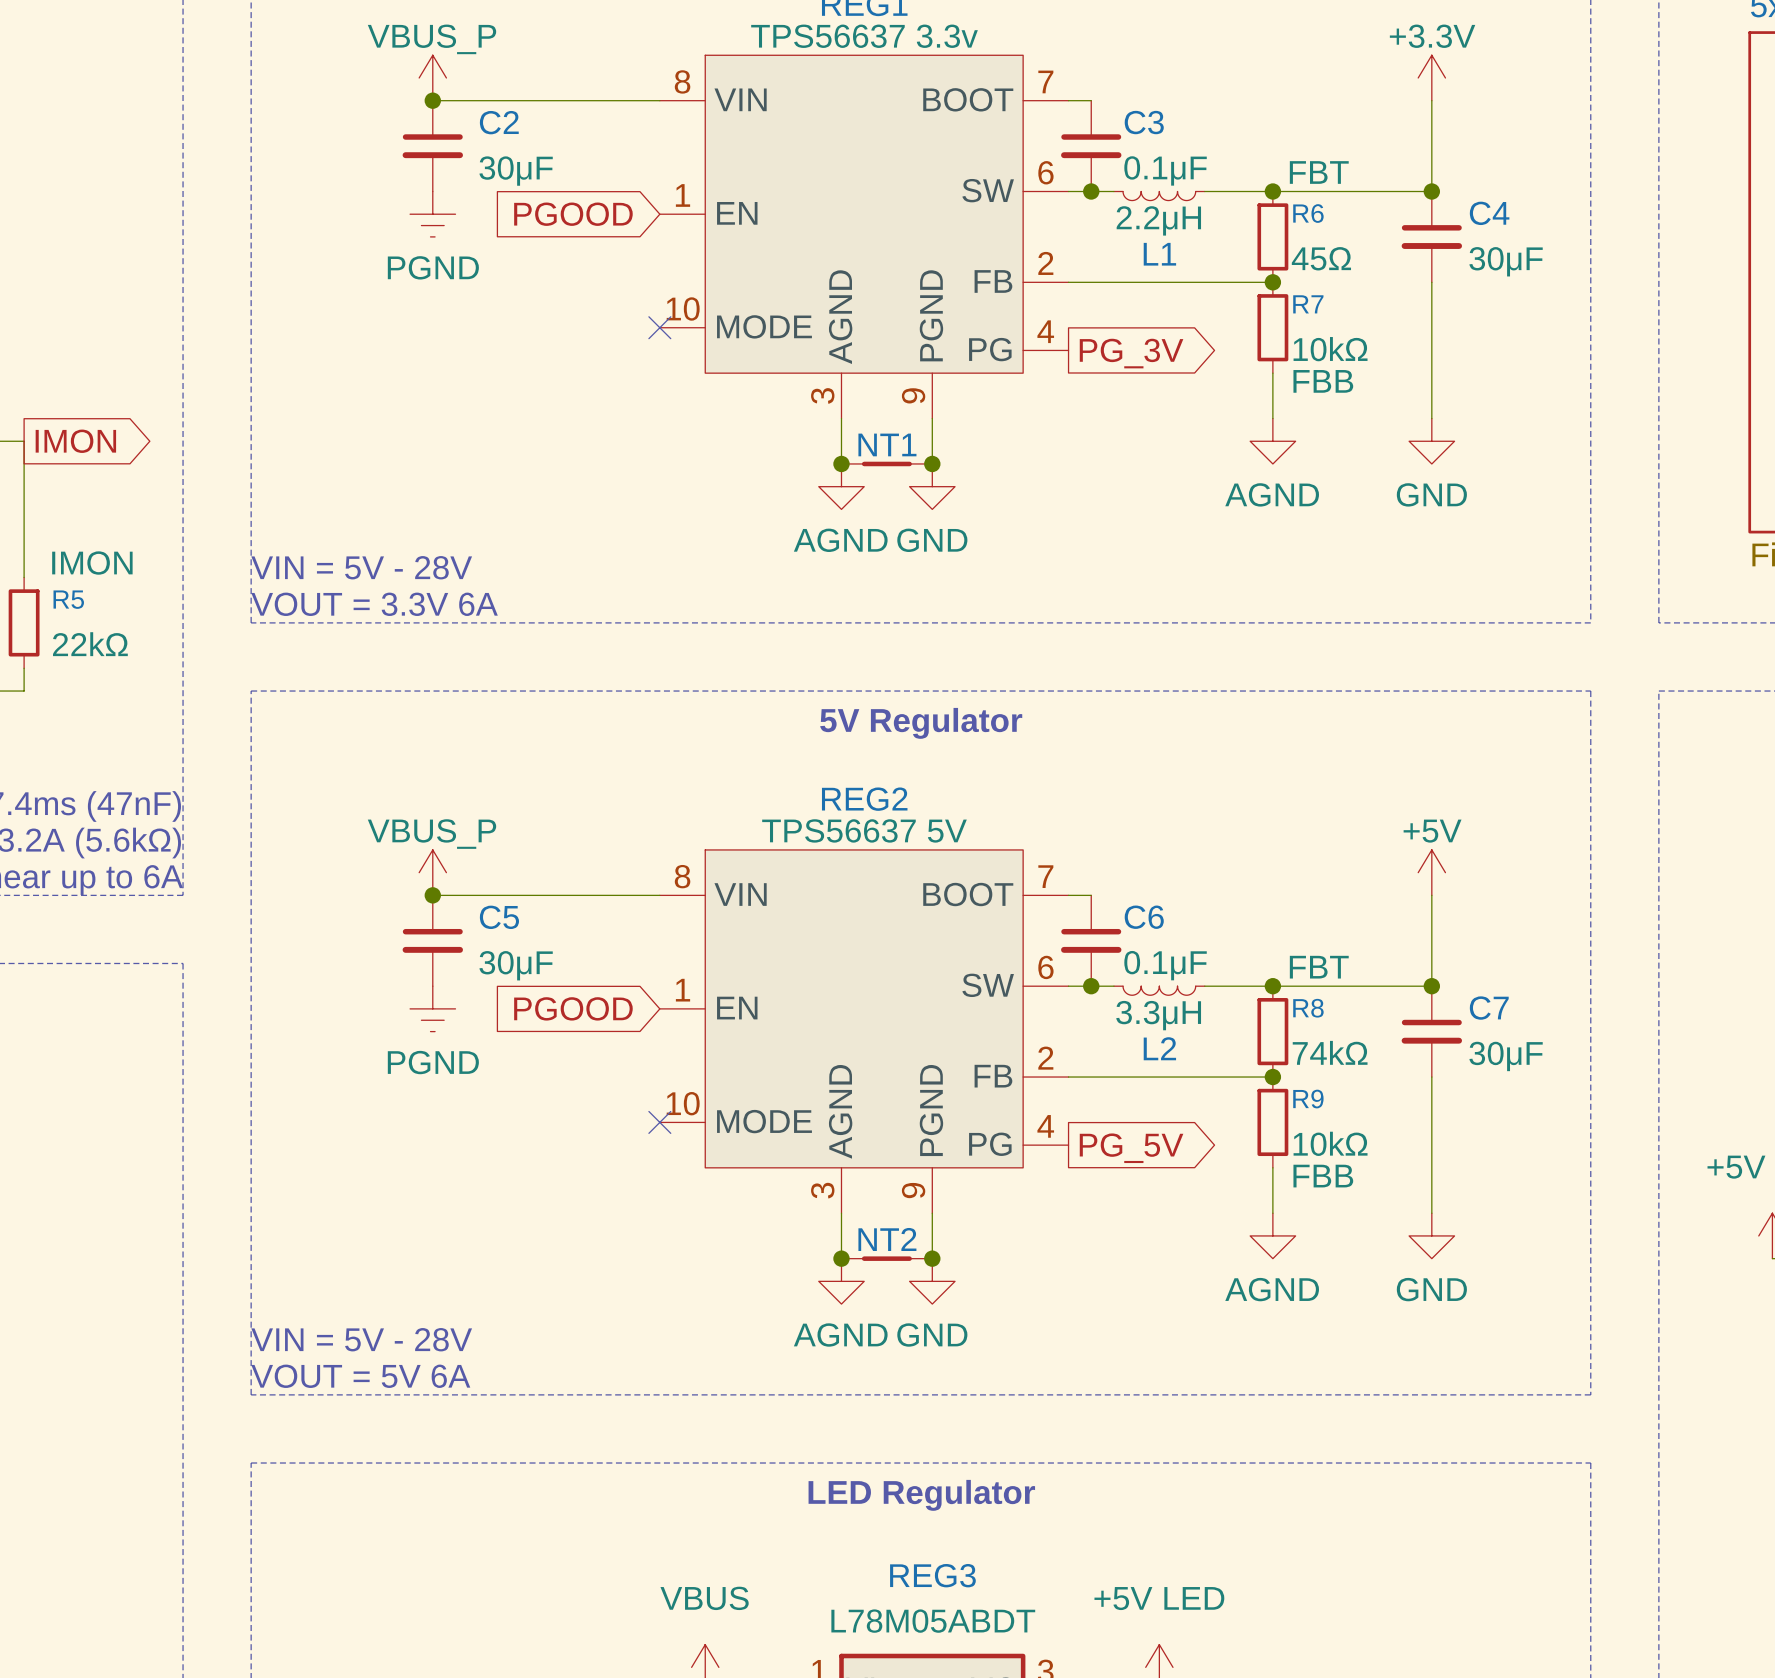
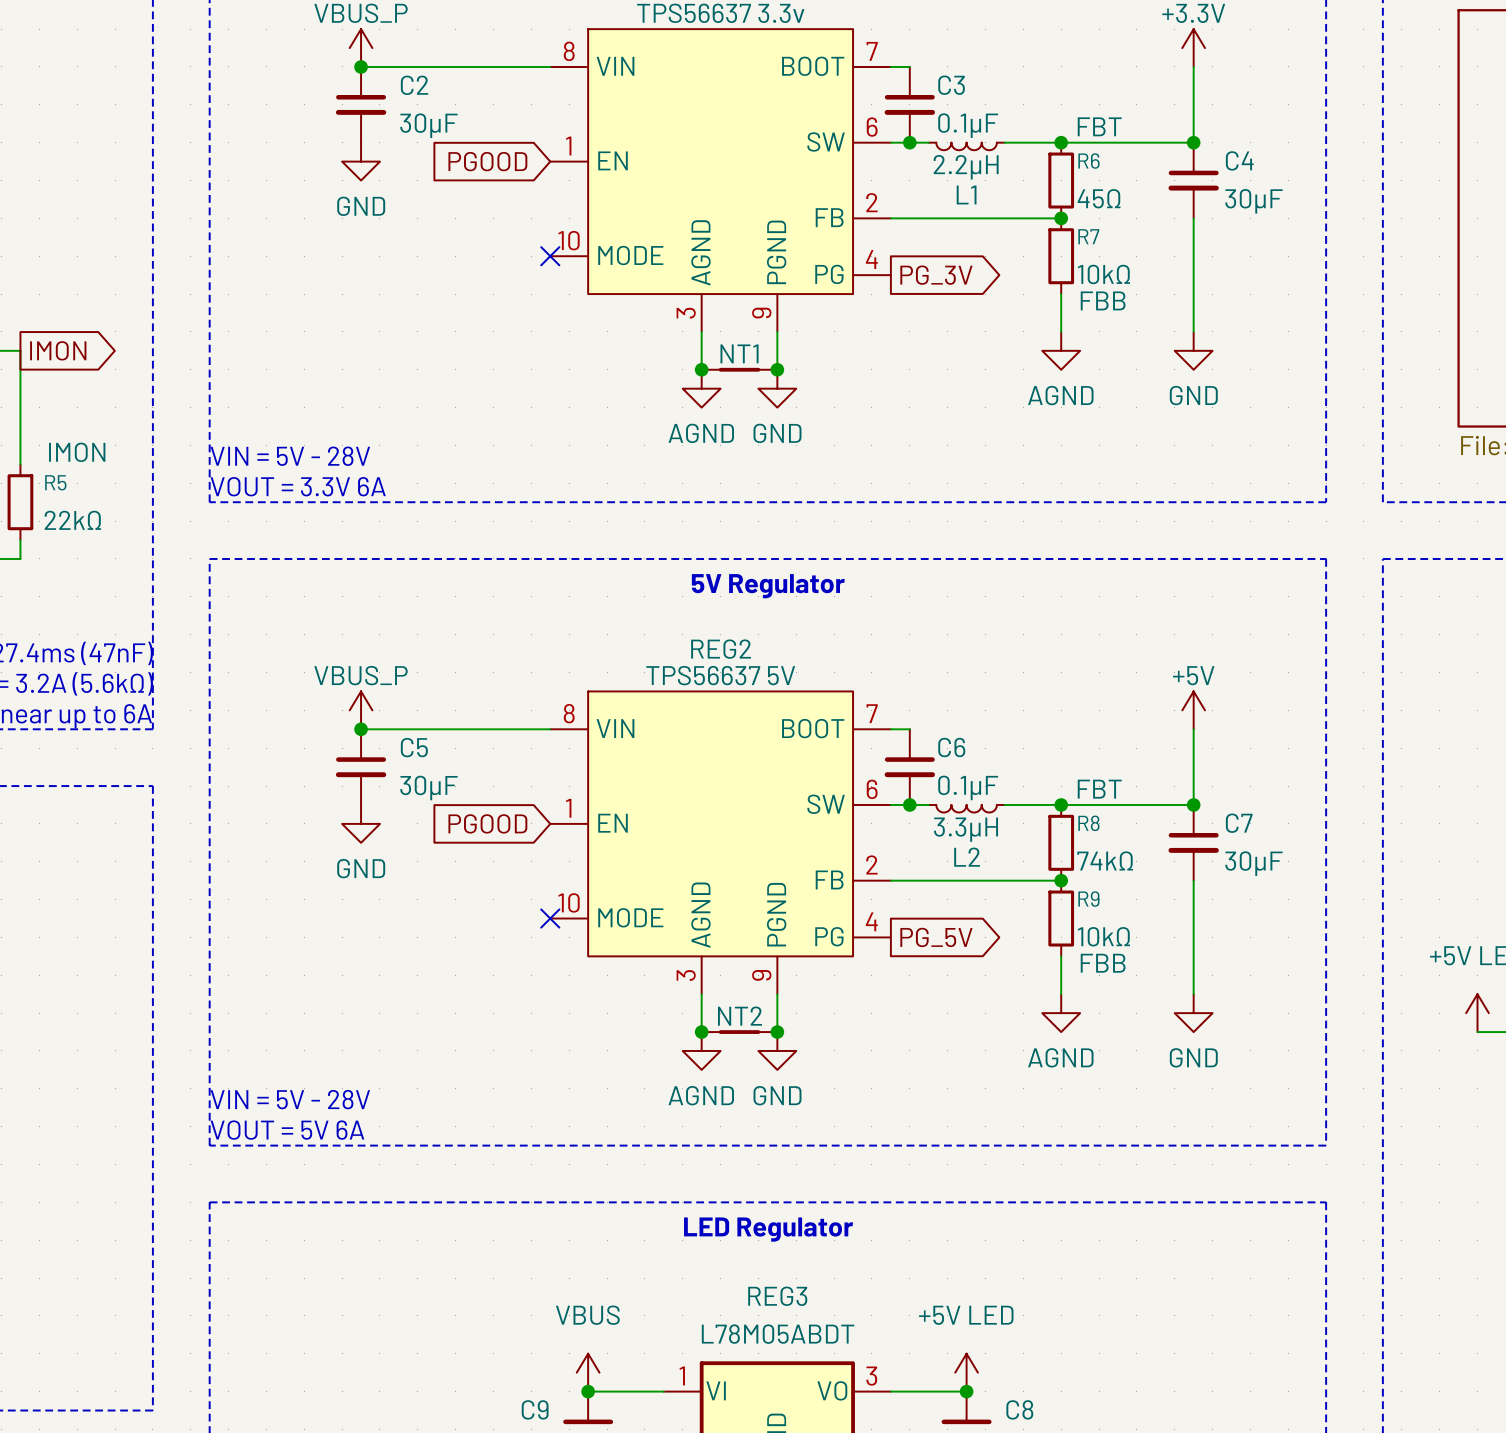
power symbol: PGND (432, 214) -> GND (361, 161)
power symbol: PGND (432, 1008) -> GND (361, 823)

